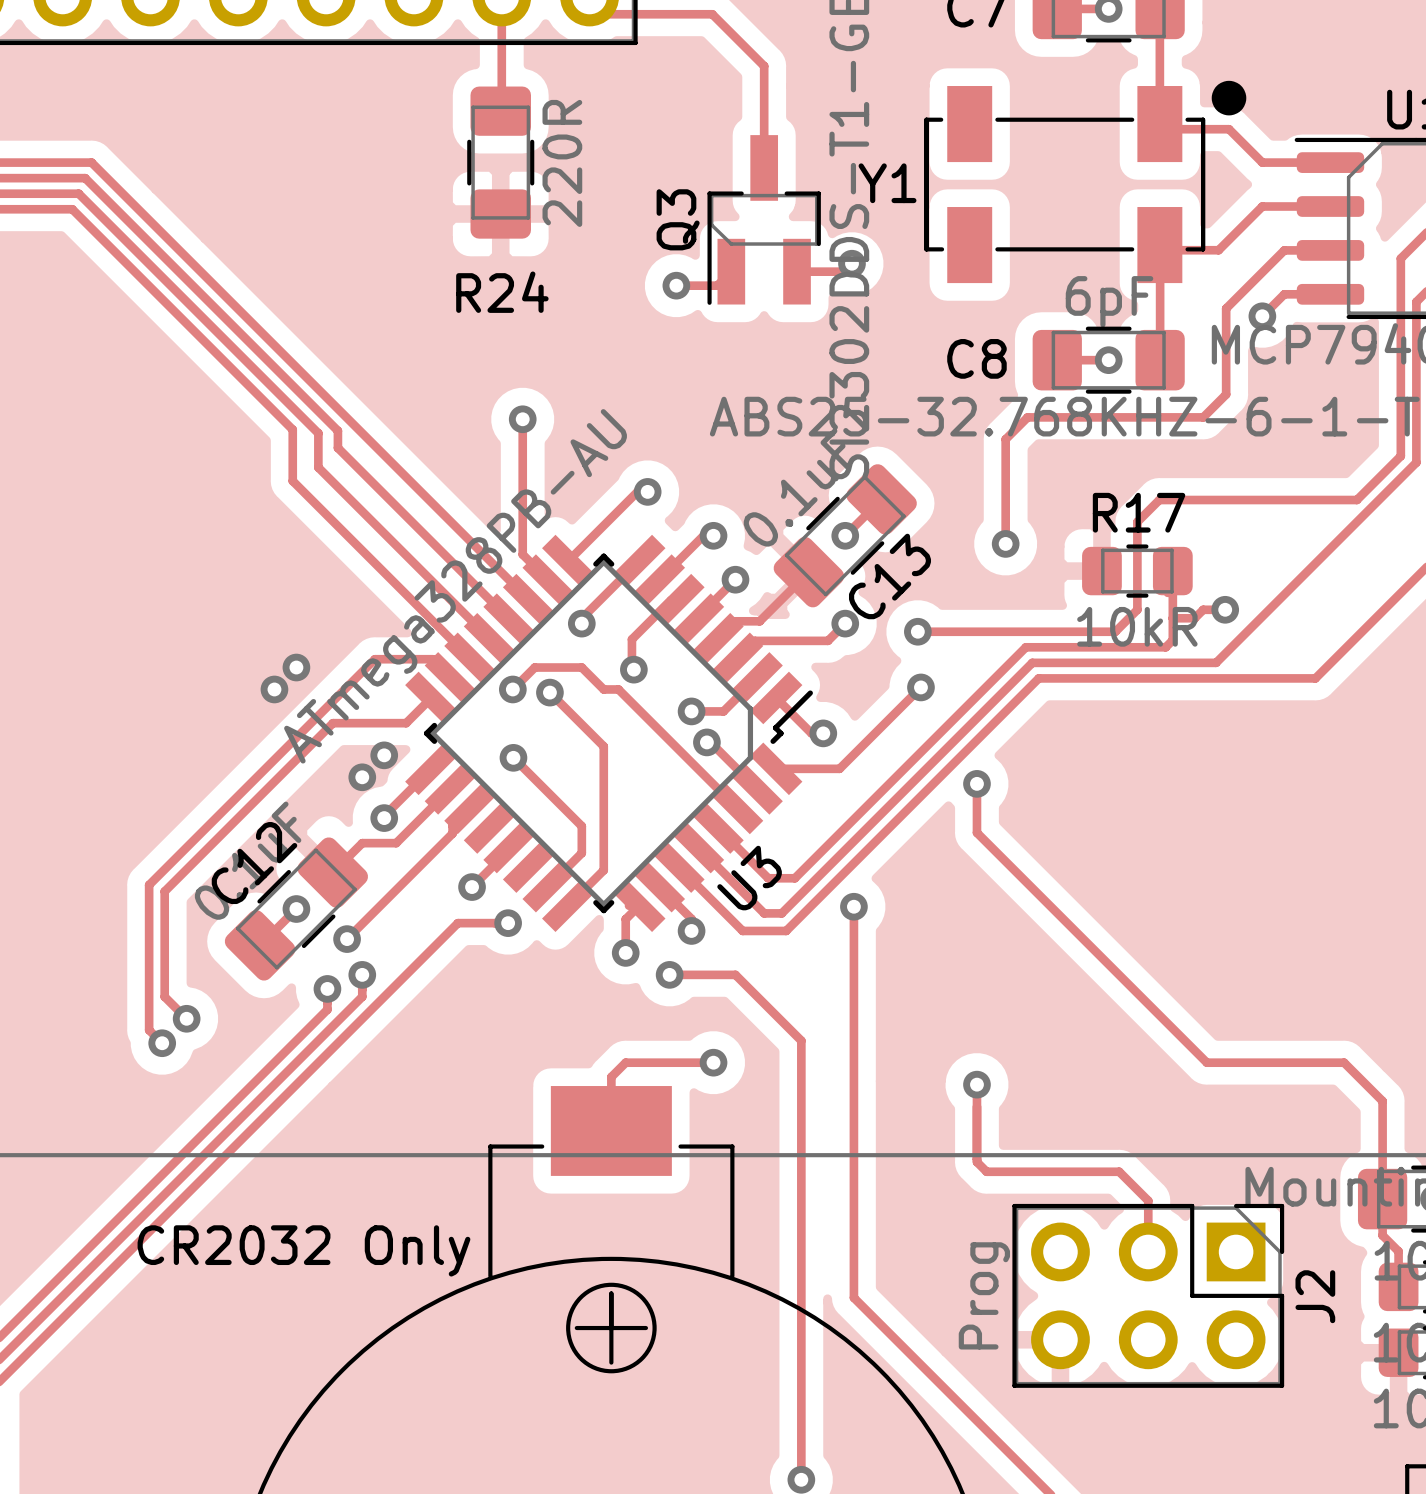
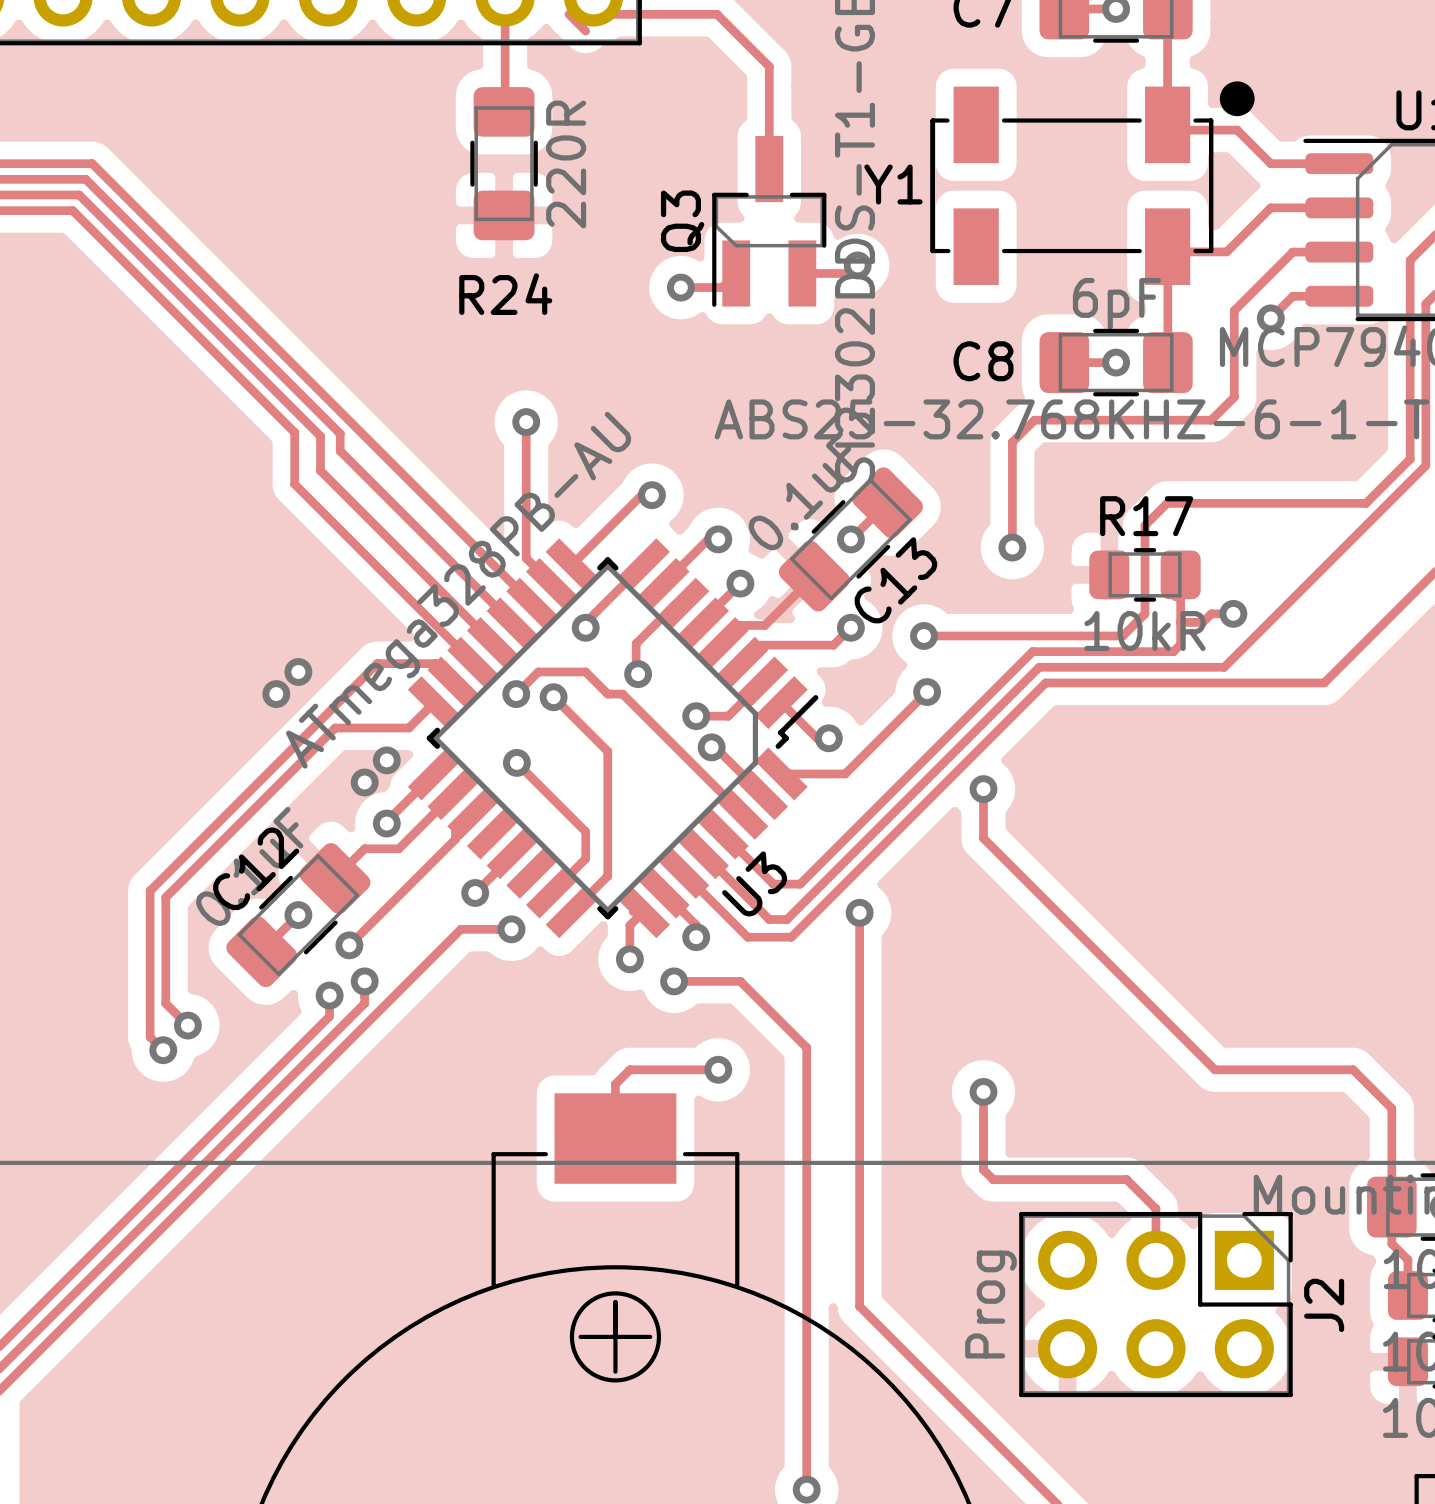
track: none -> (568, 14) (585, 31)
text: CR2032 Only (303, 1250) -> none

